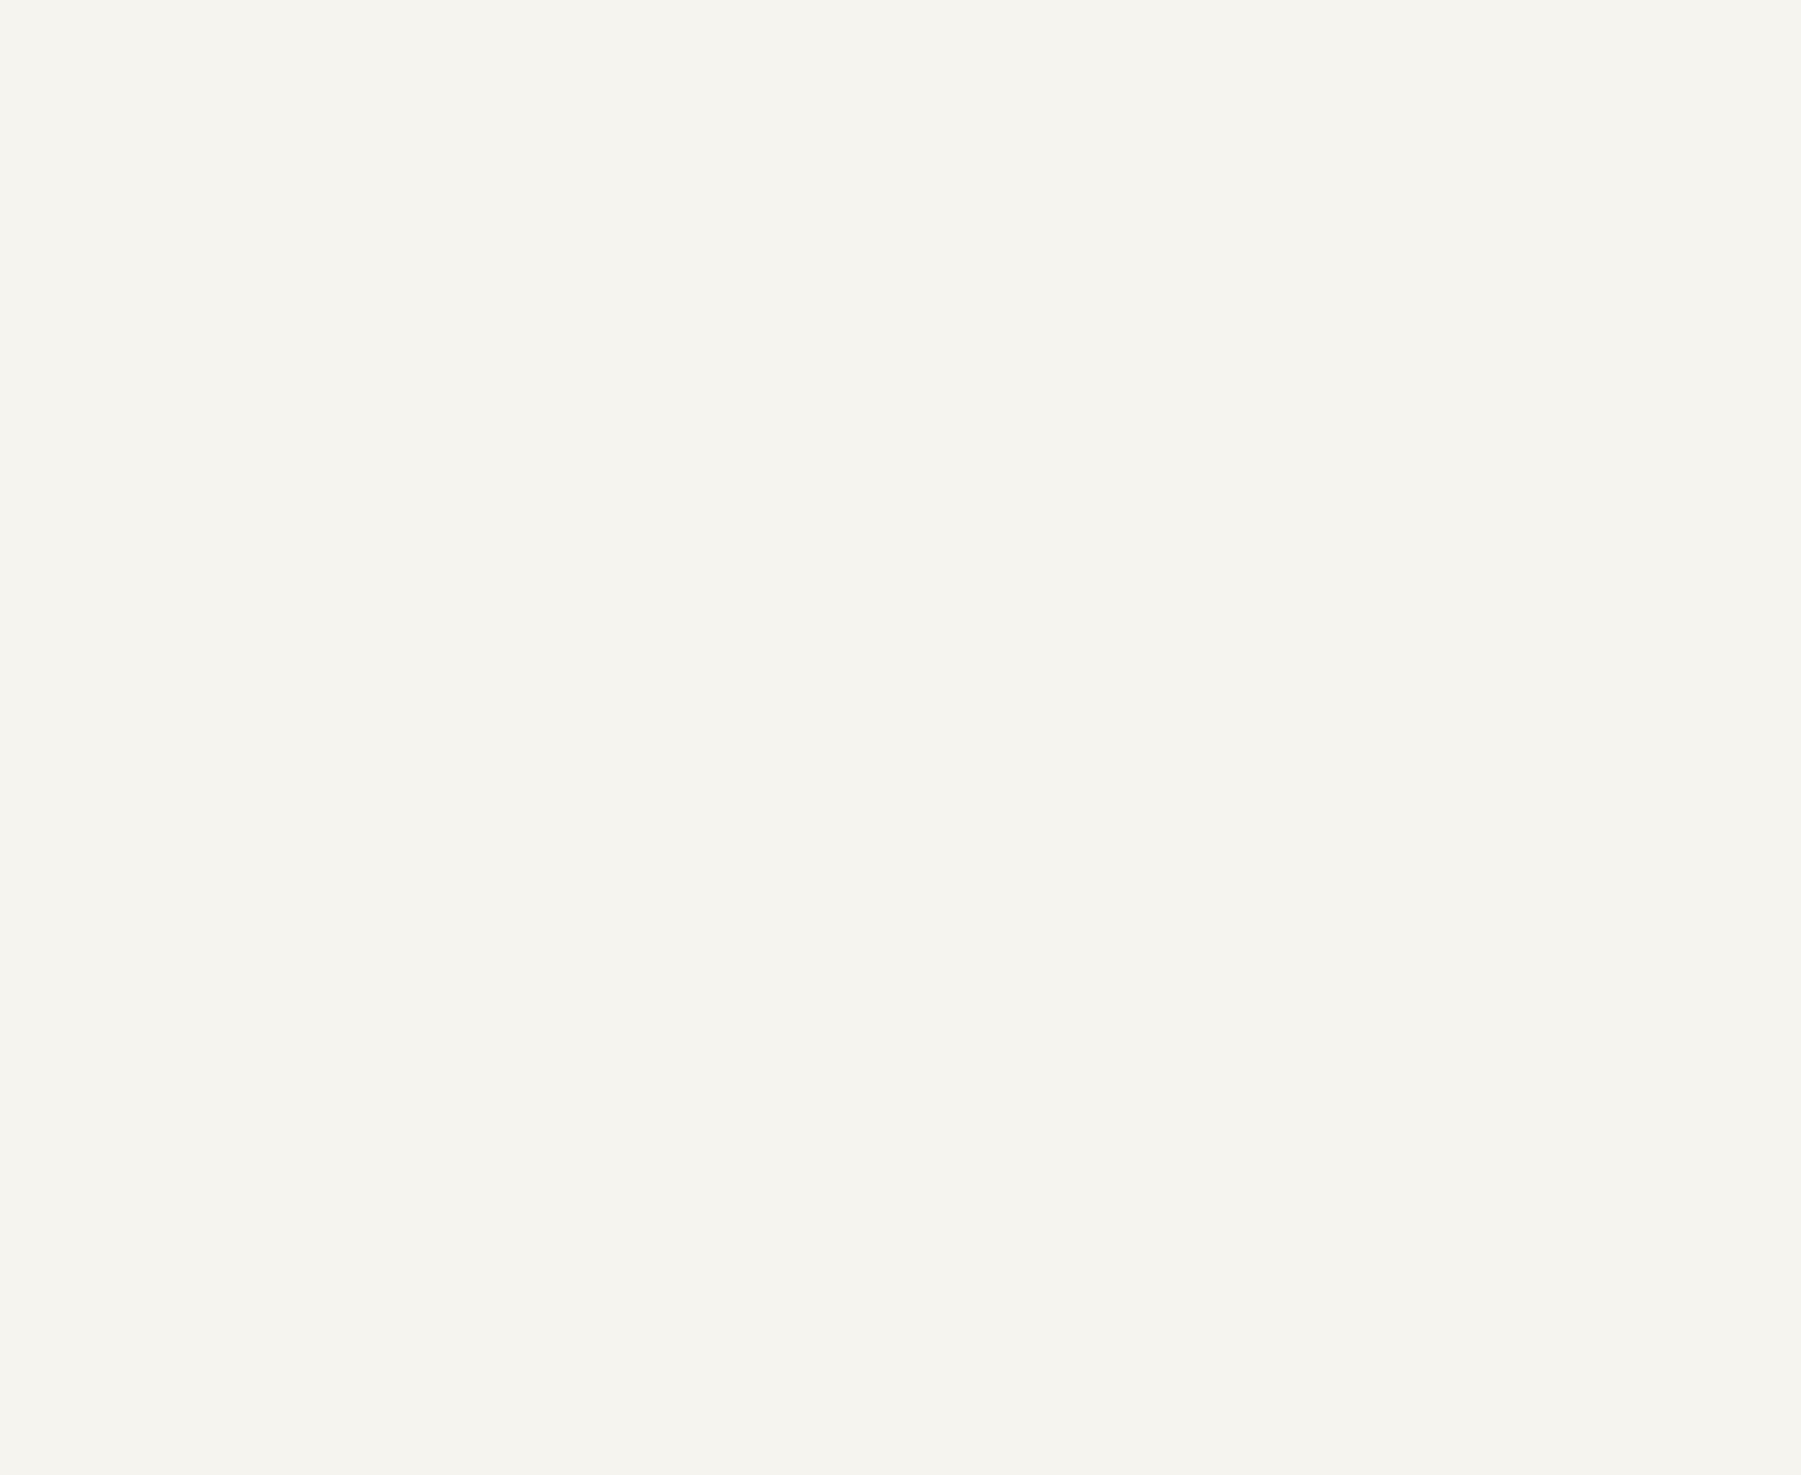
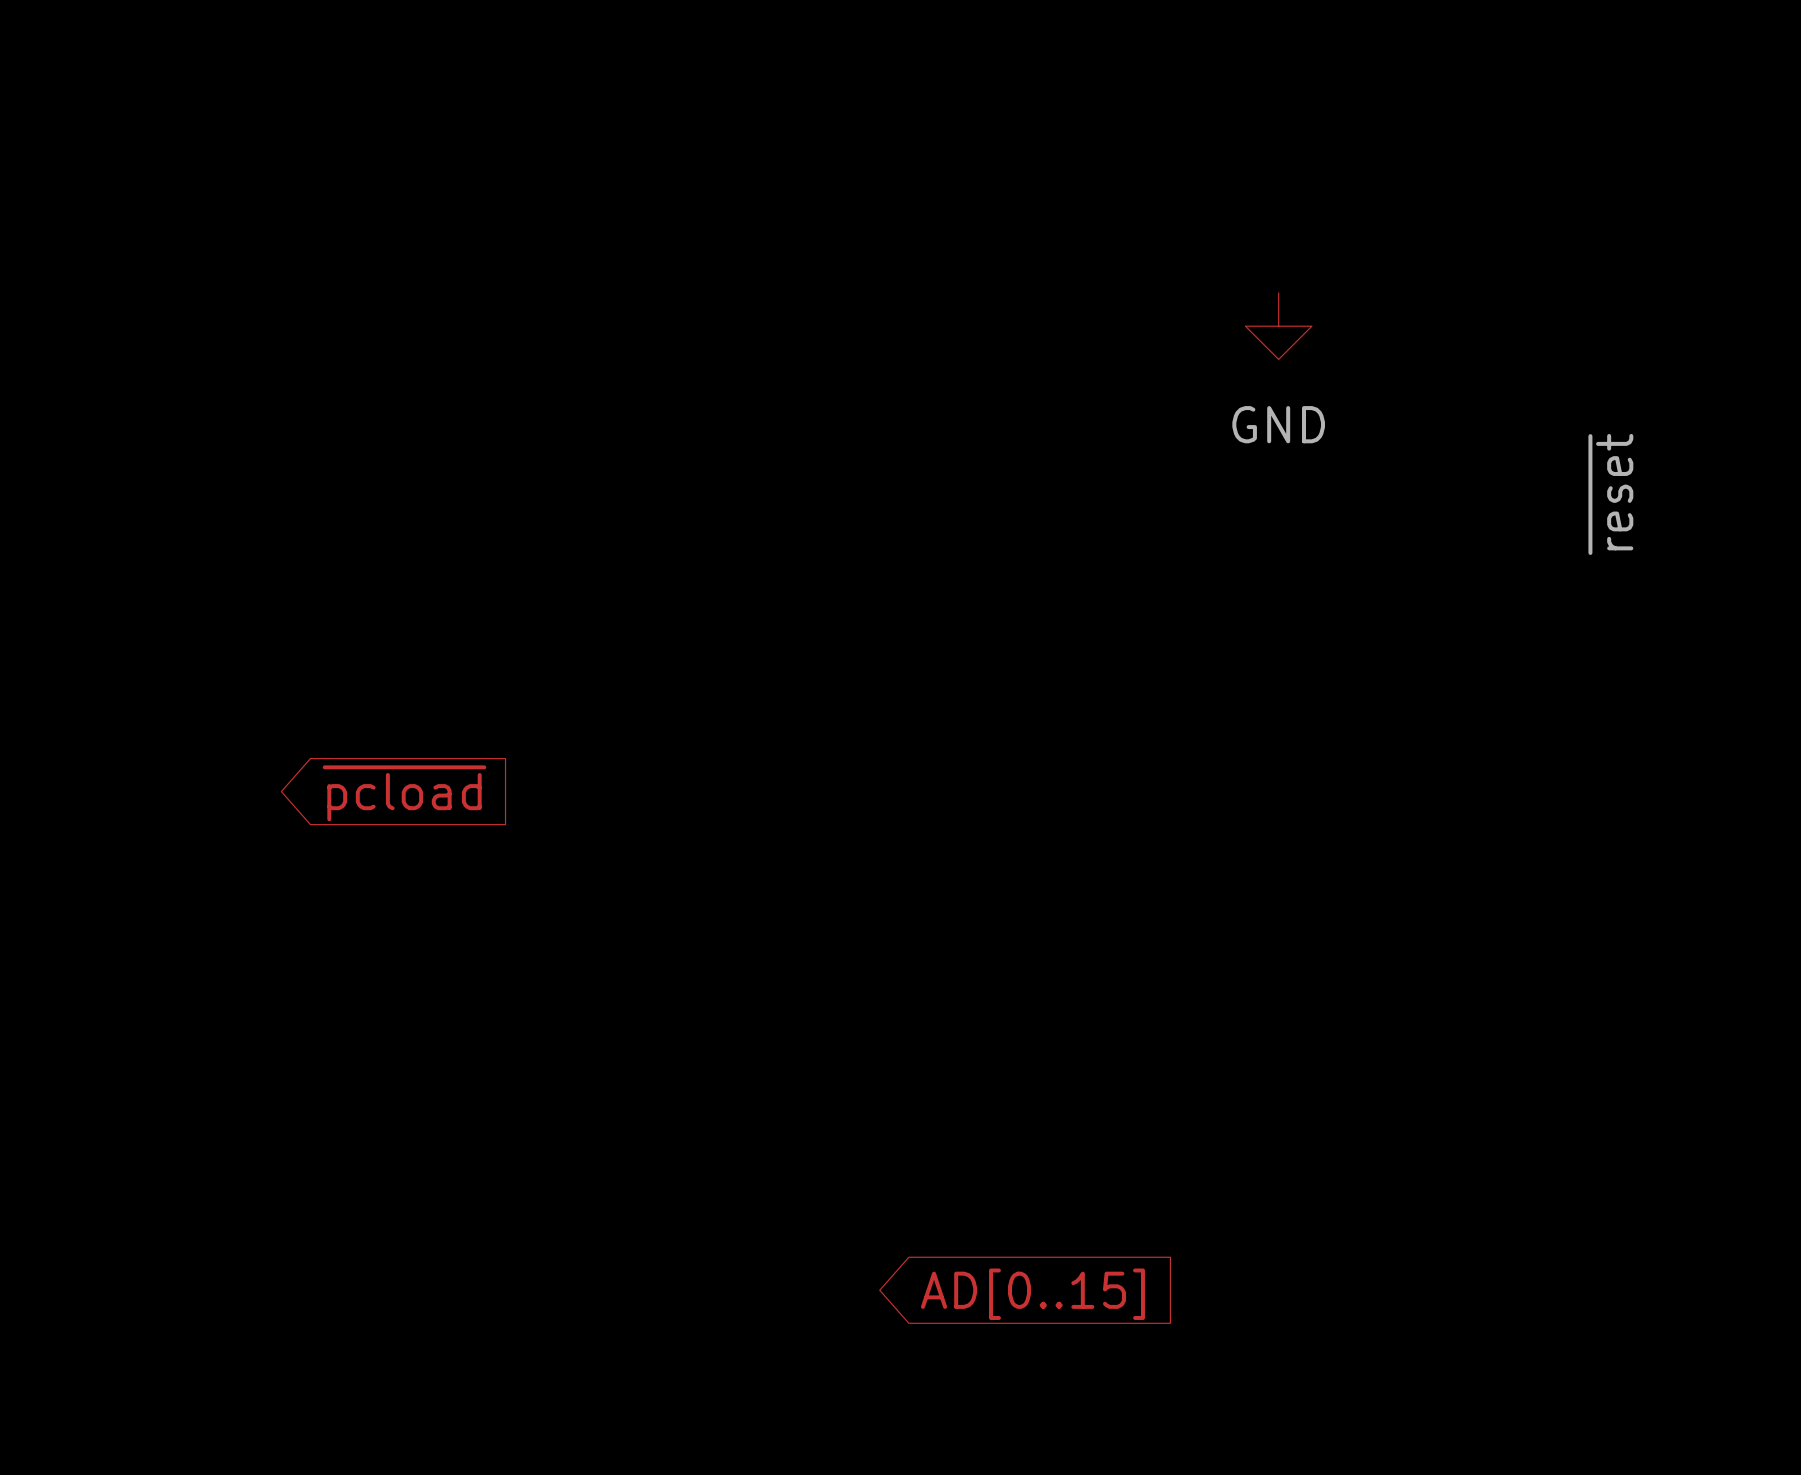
power symbol: none -> GND (1278, 326)
label: none -> ~{reset} (1610, 494)
global label: none -> ~{pcload} (404, 793)
global label: none -> AD[0..15] (1032, 1294)

